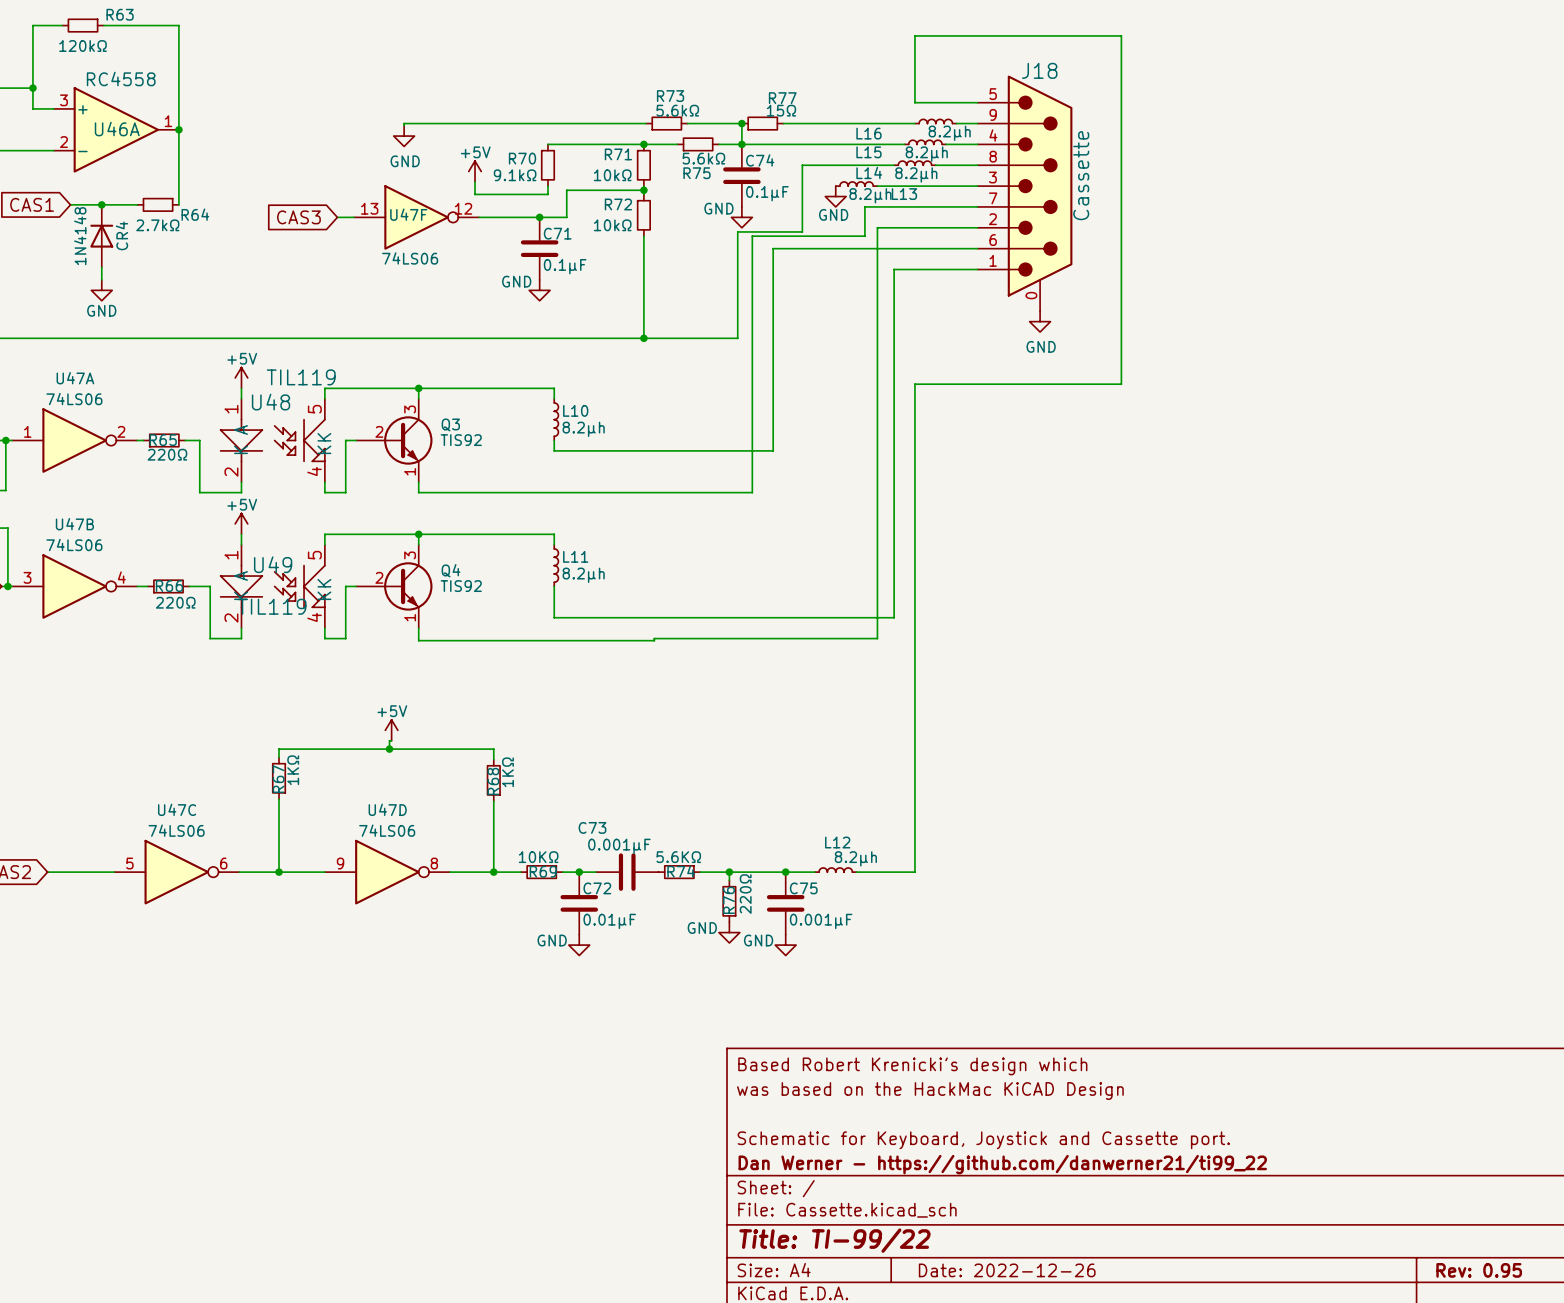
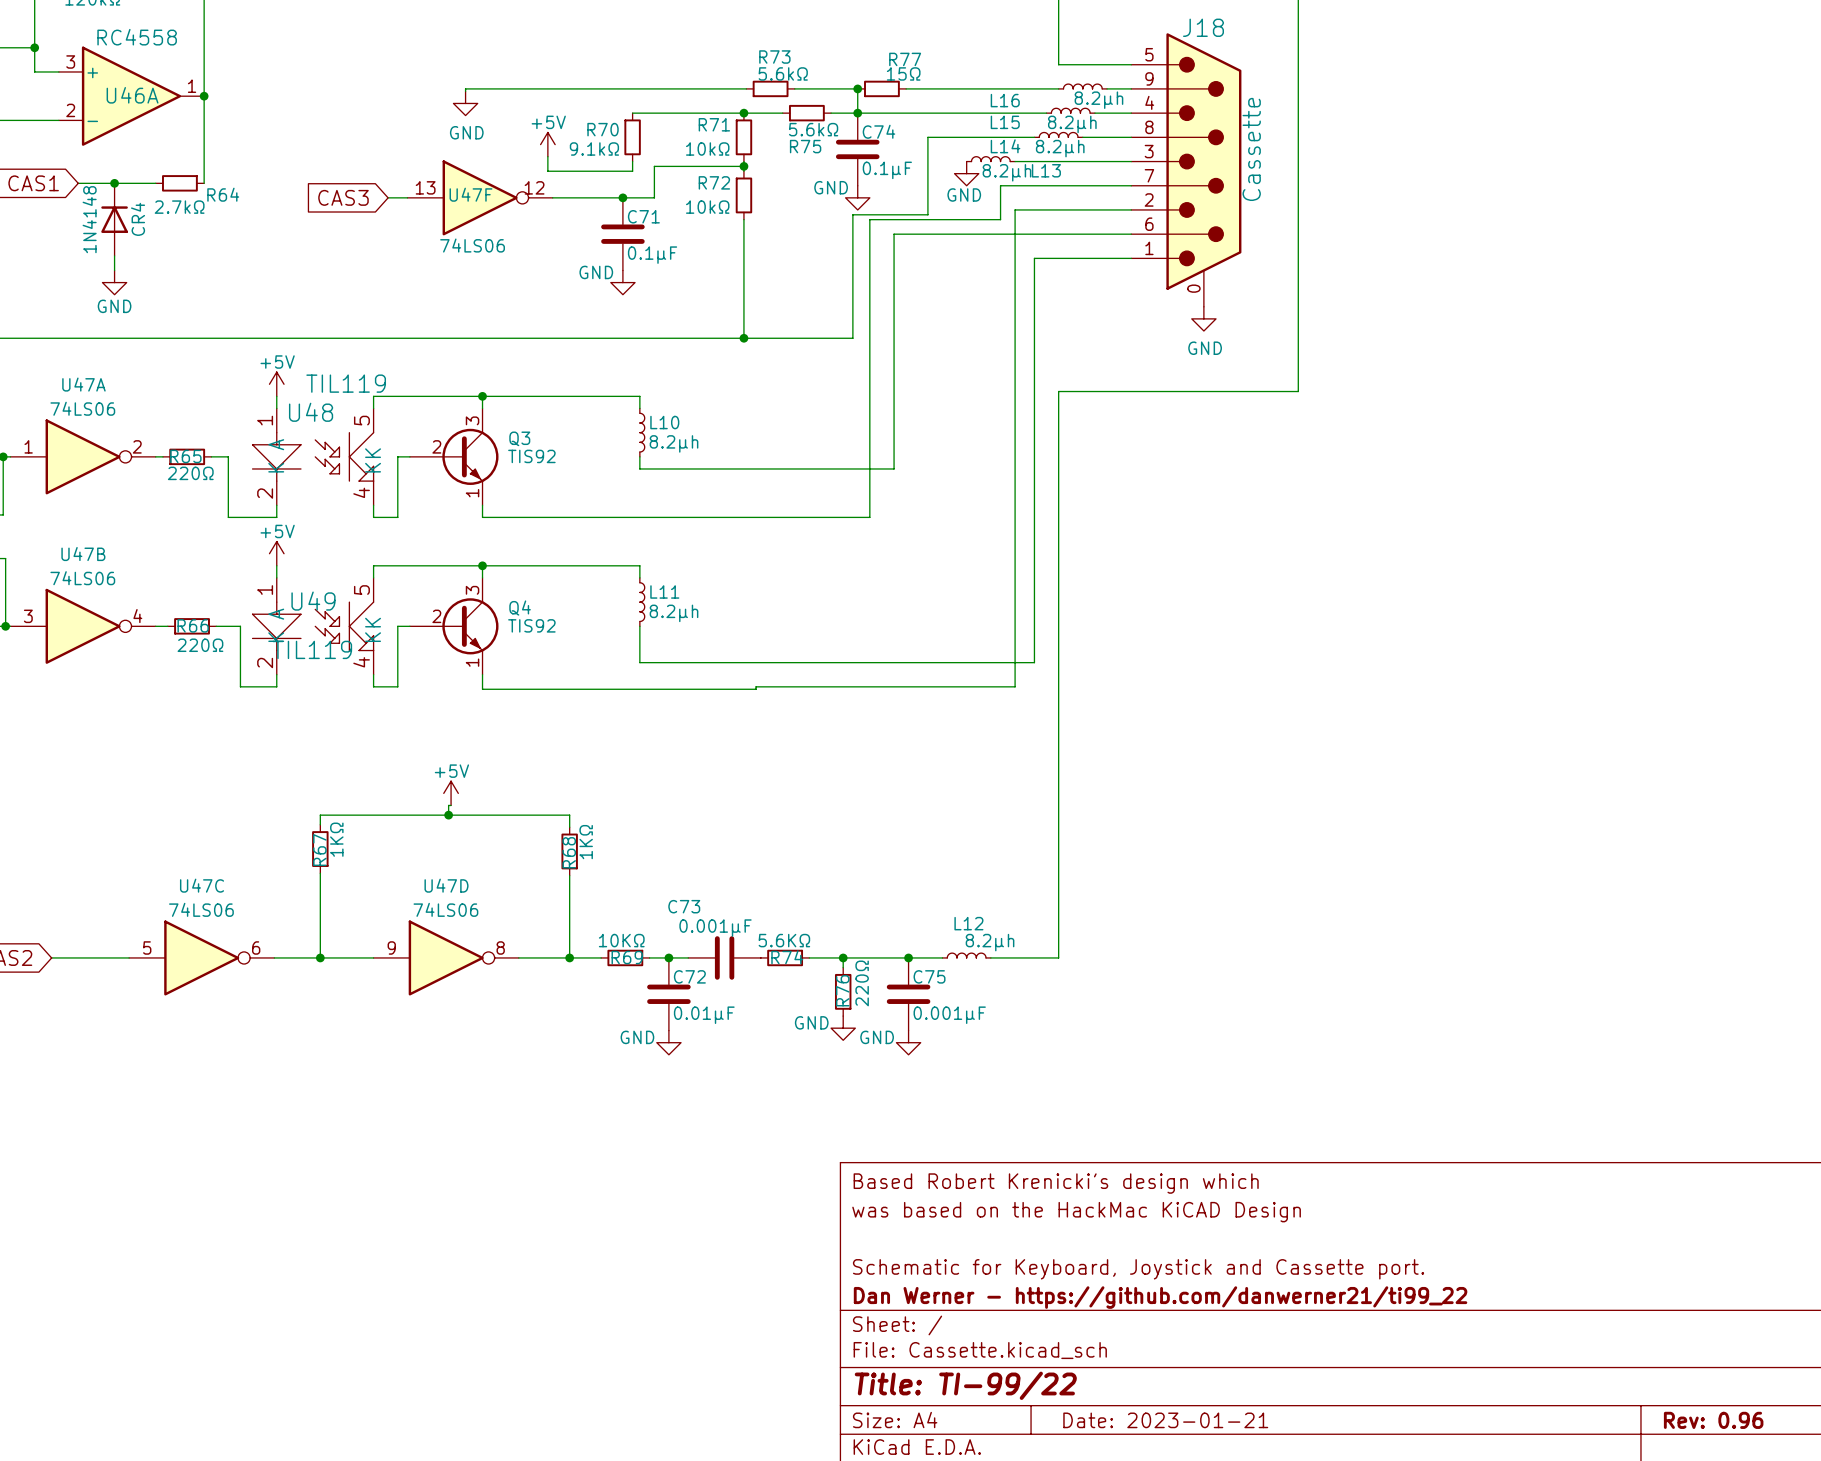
title block: Date: 2022-12-26 (1007, 1270) -> Date: 2023-01-21 (1165, 1420)
title block: Rev: 0.95 (1479, 1270) -> Rev: 0.96 (1713, 1420)

